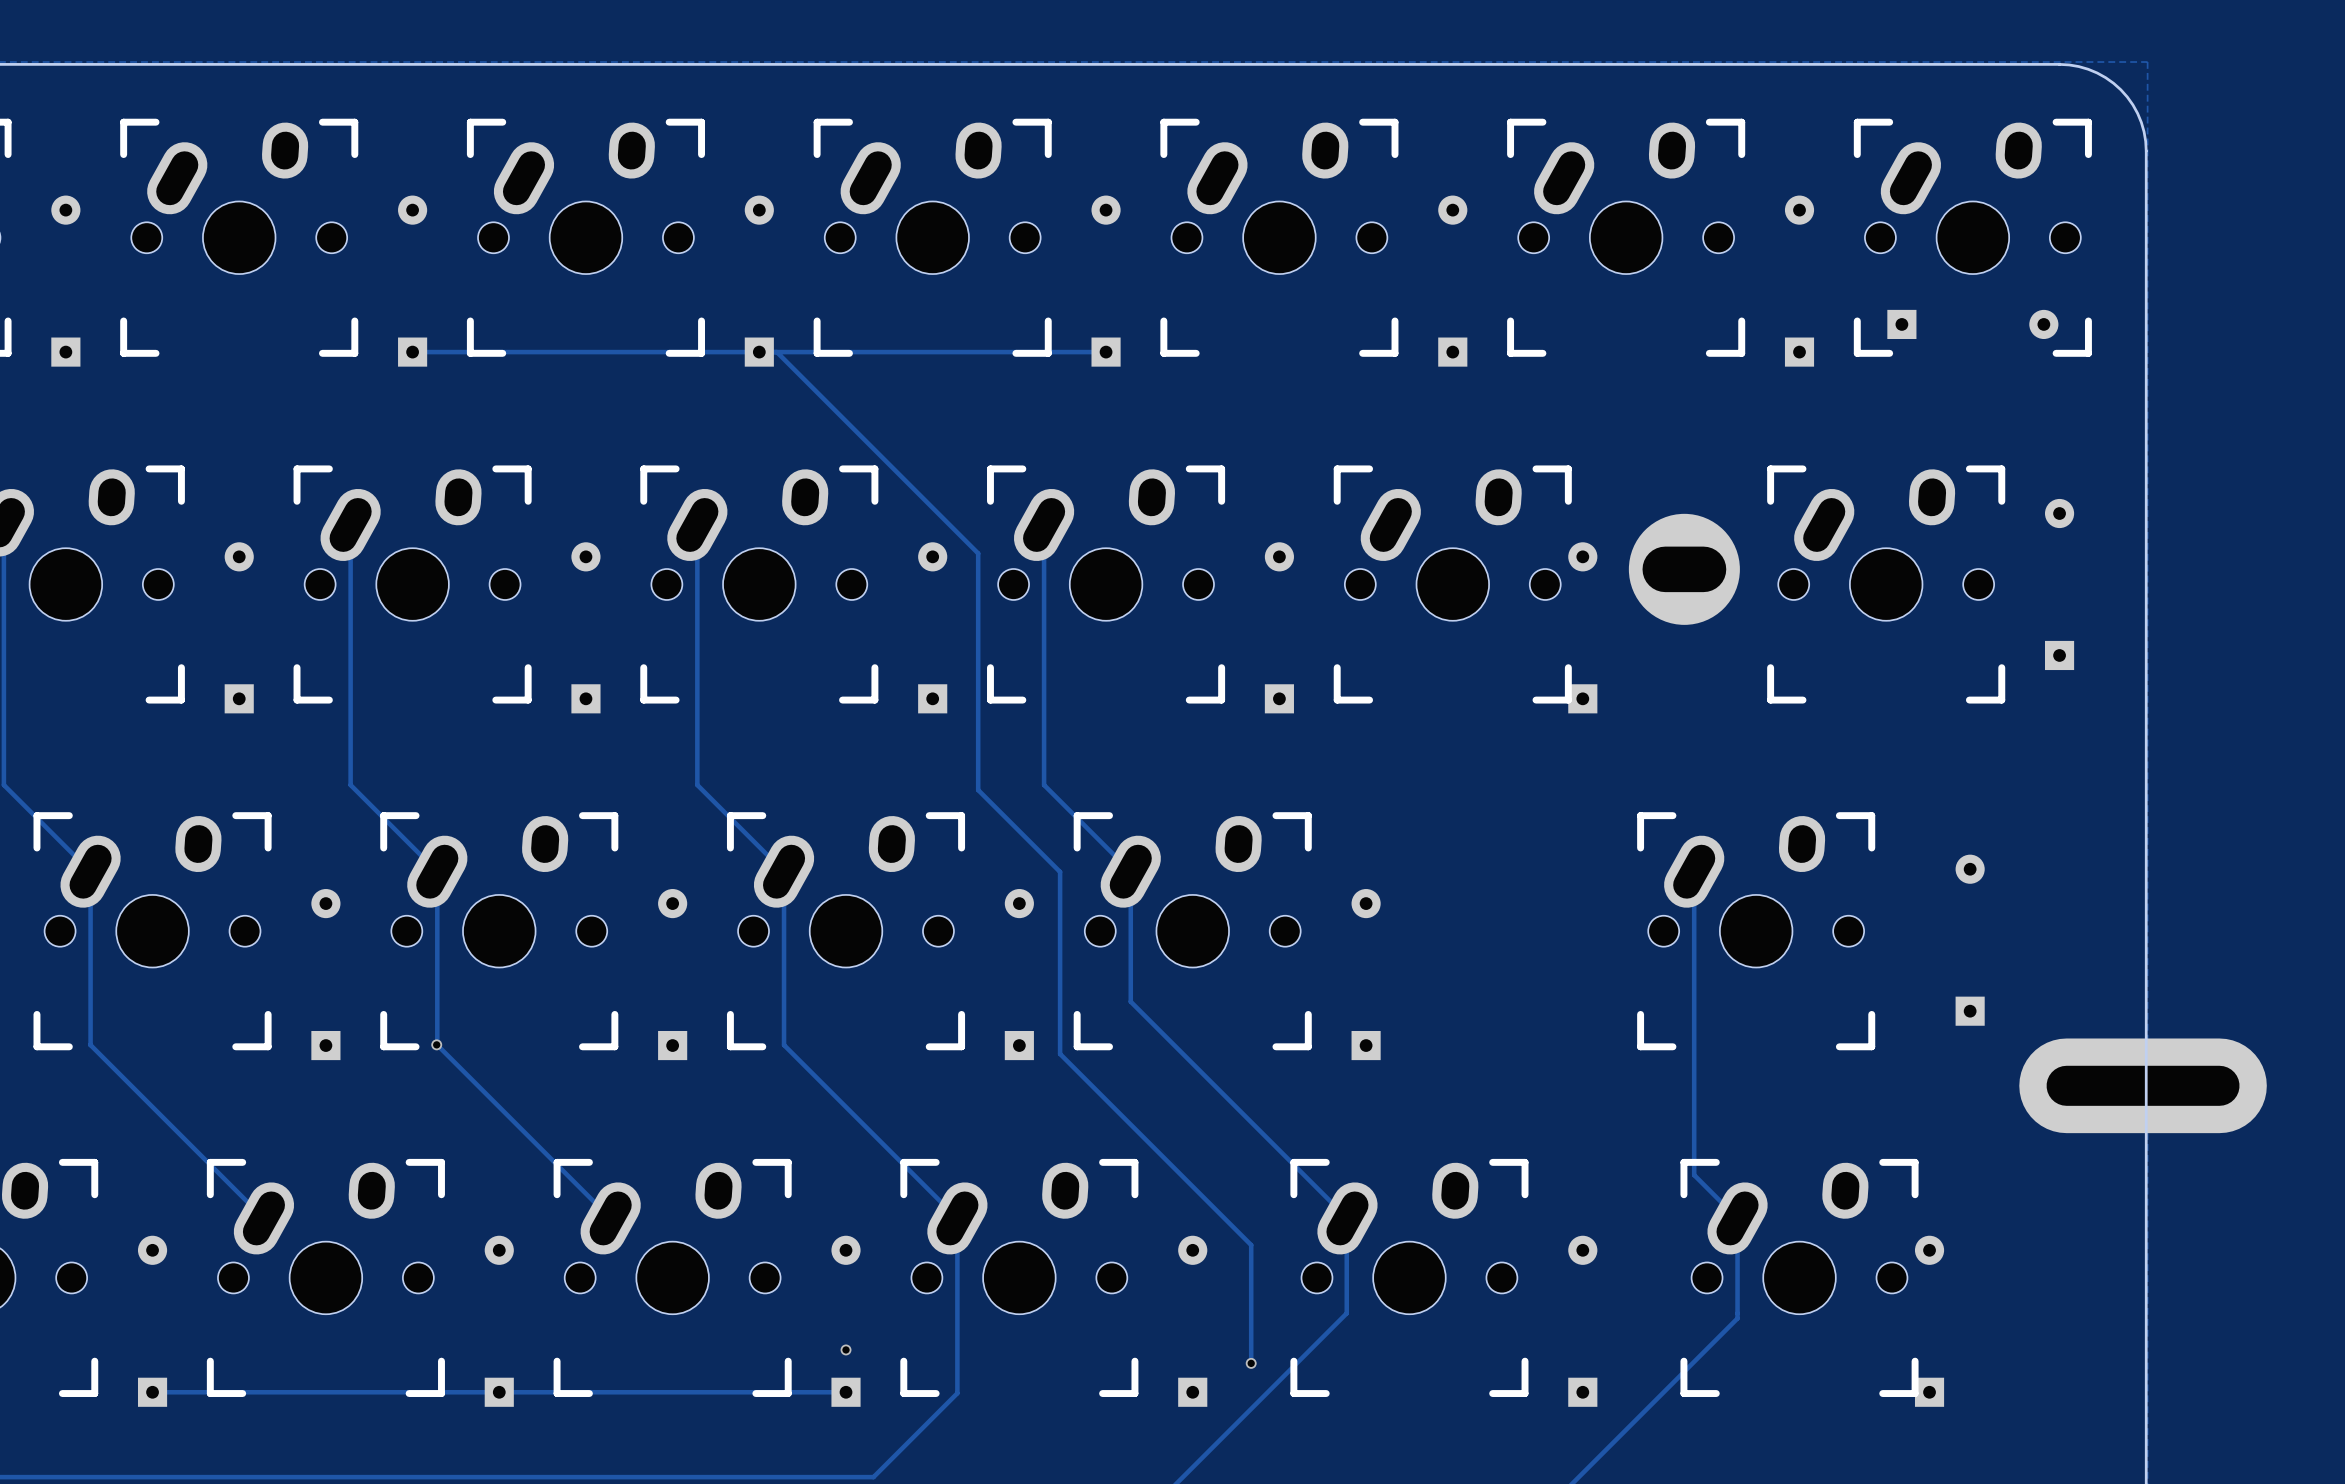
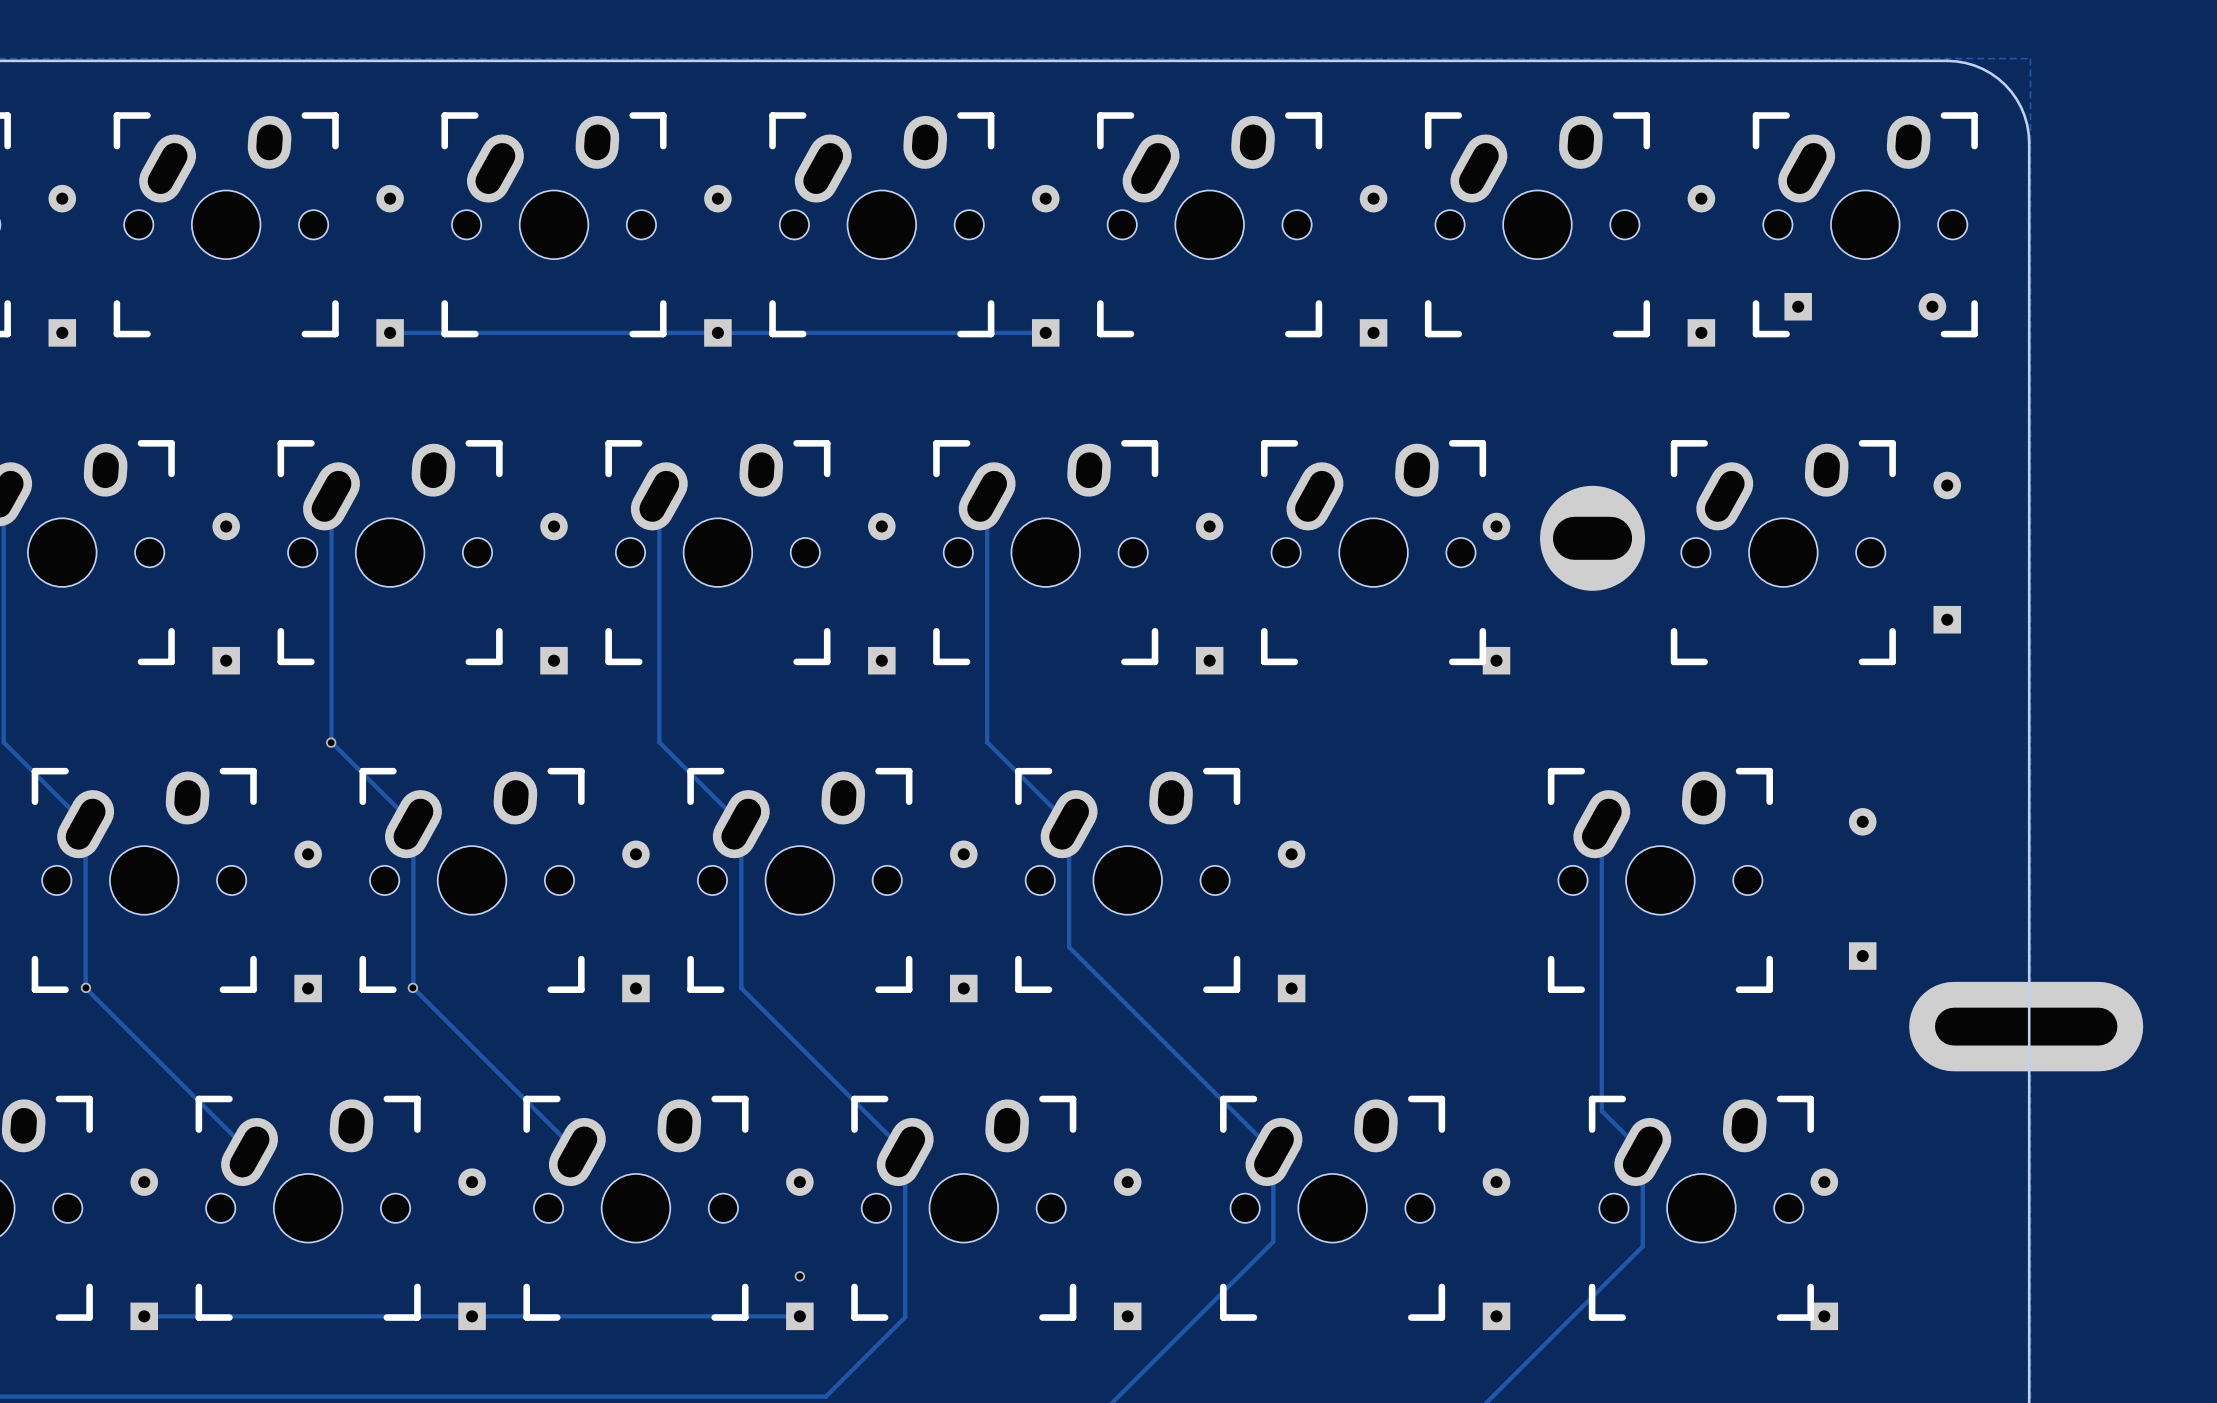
track: (776, 352) (978, 553) (978, 790) (1060, 871) (1060, 1053) (1251, 1245) (1251, 1363) -> none
via: none -> (331, 742)
via: none -> (85, 987)
via: (1251, 1363) -> none

